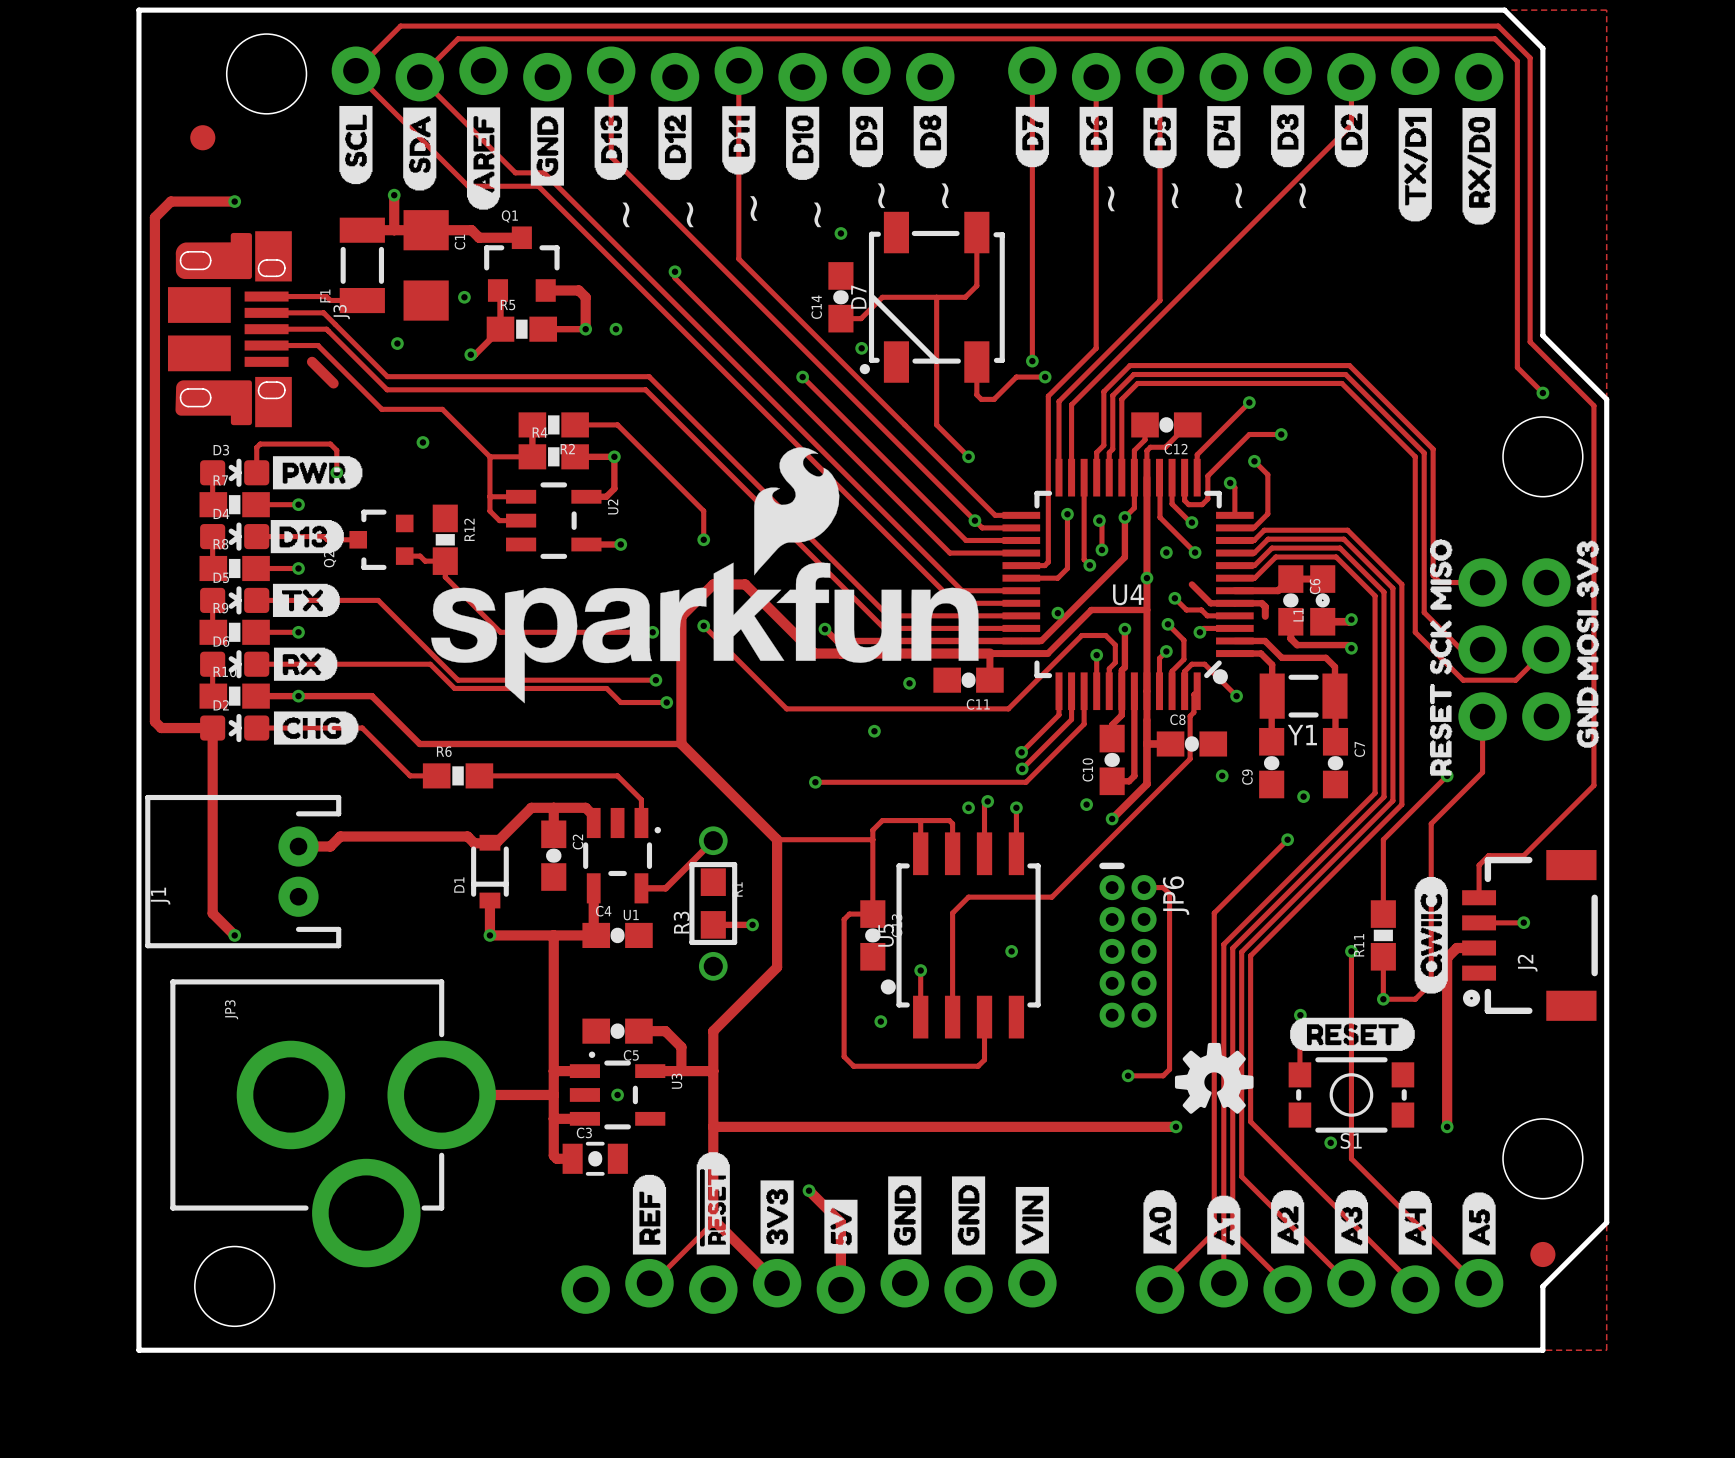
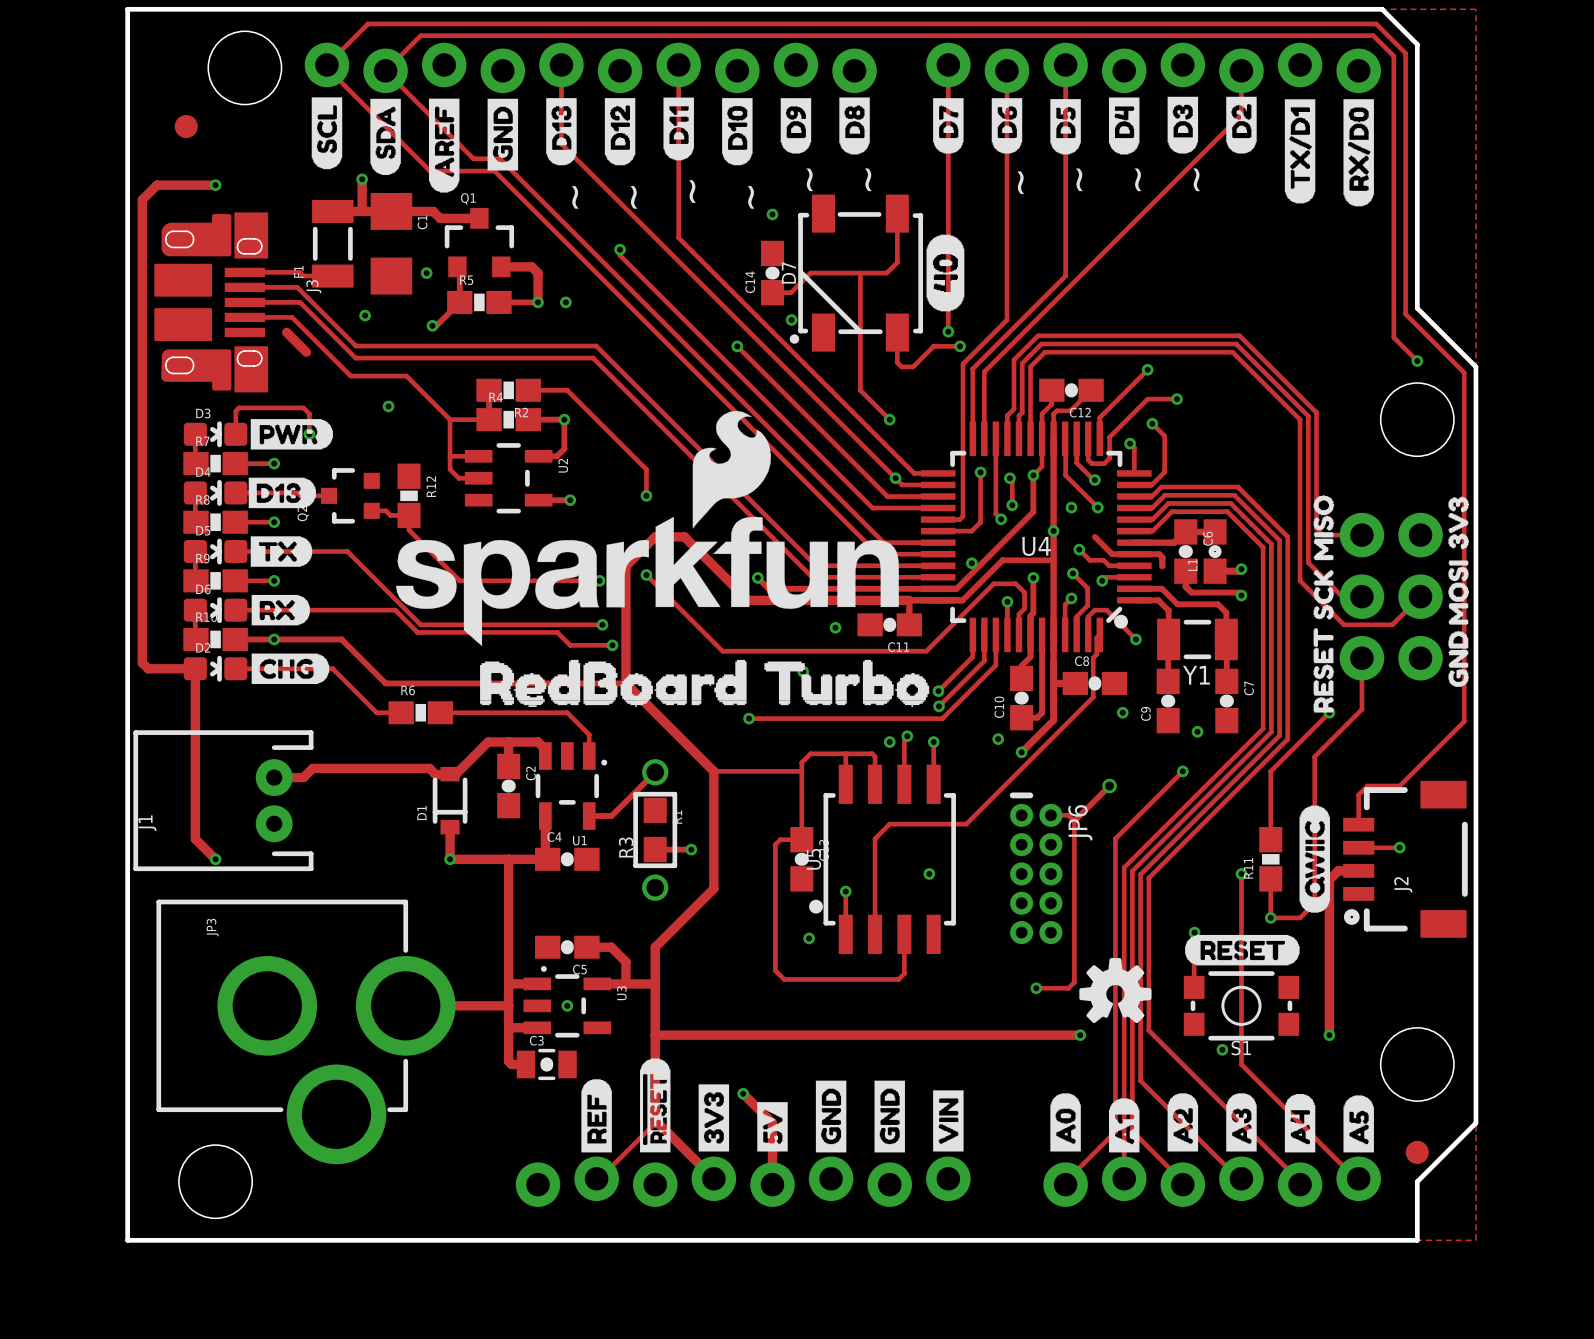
drawing: none -> [926, 234, 965, 312]
drawing: none -> [480, 659, 930, 707]
track: none -> (1109, 786) (1074, 821)
part: none -> (1109, 786)

